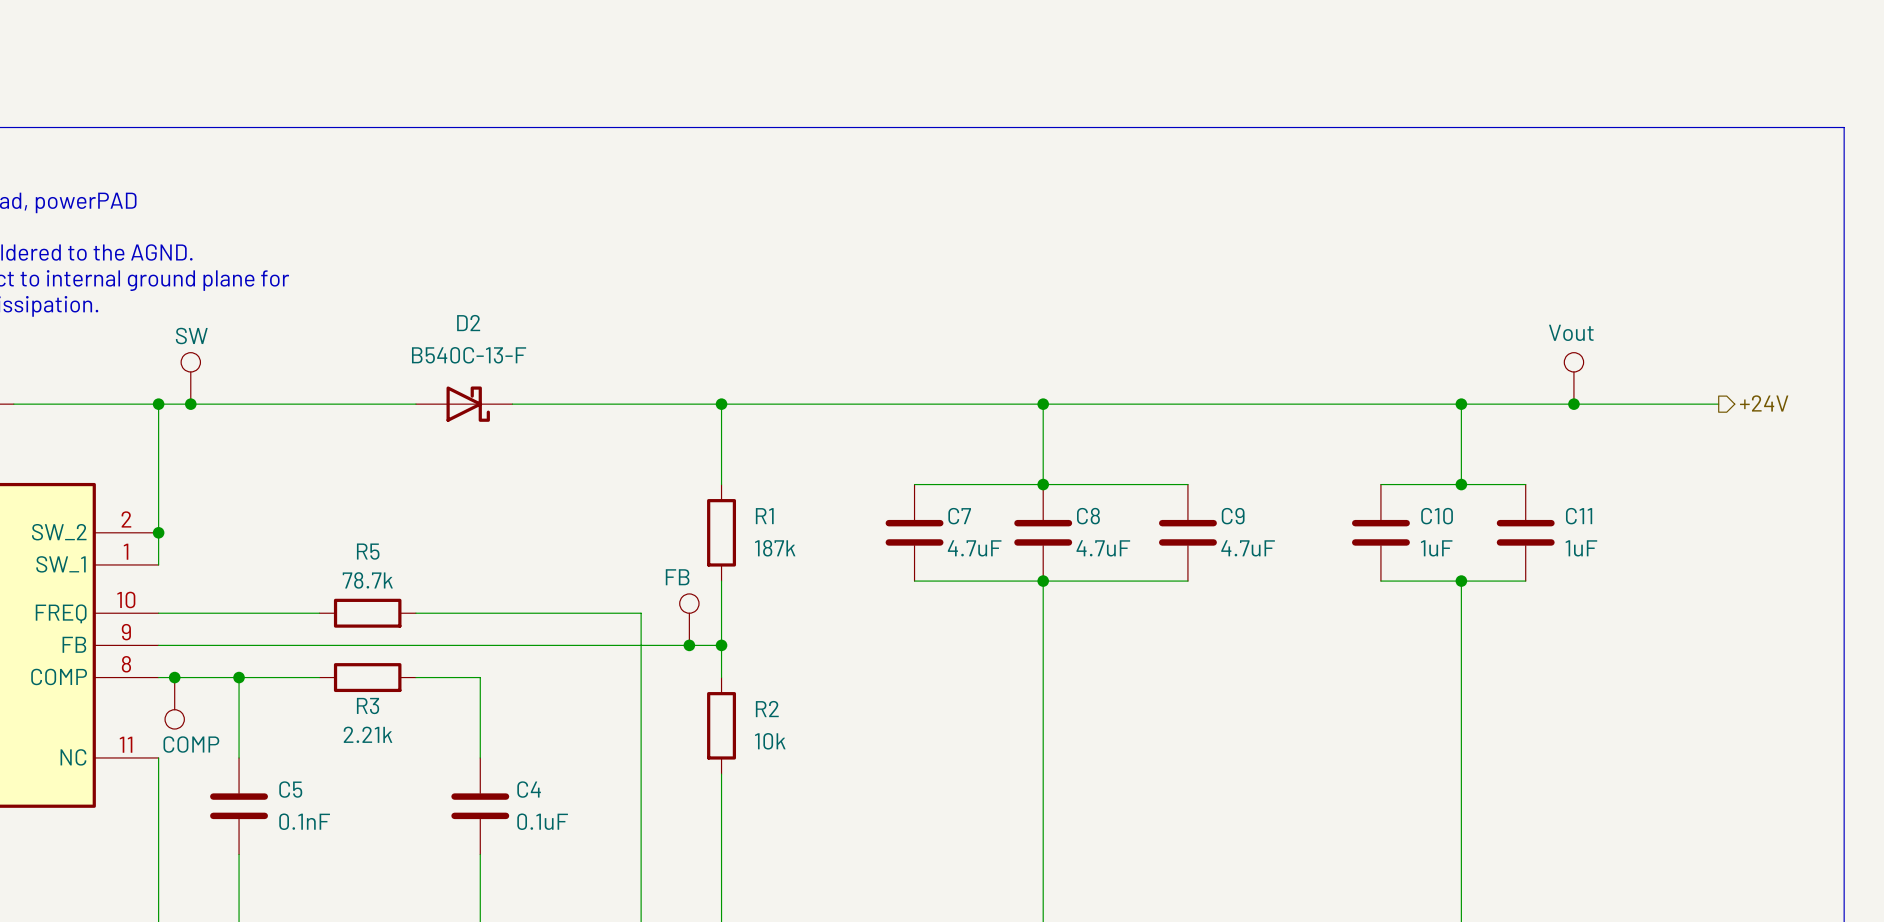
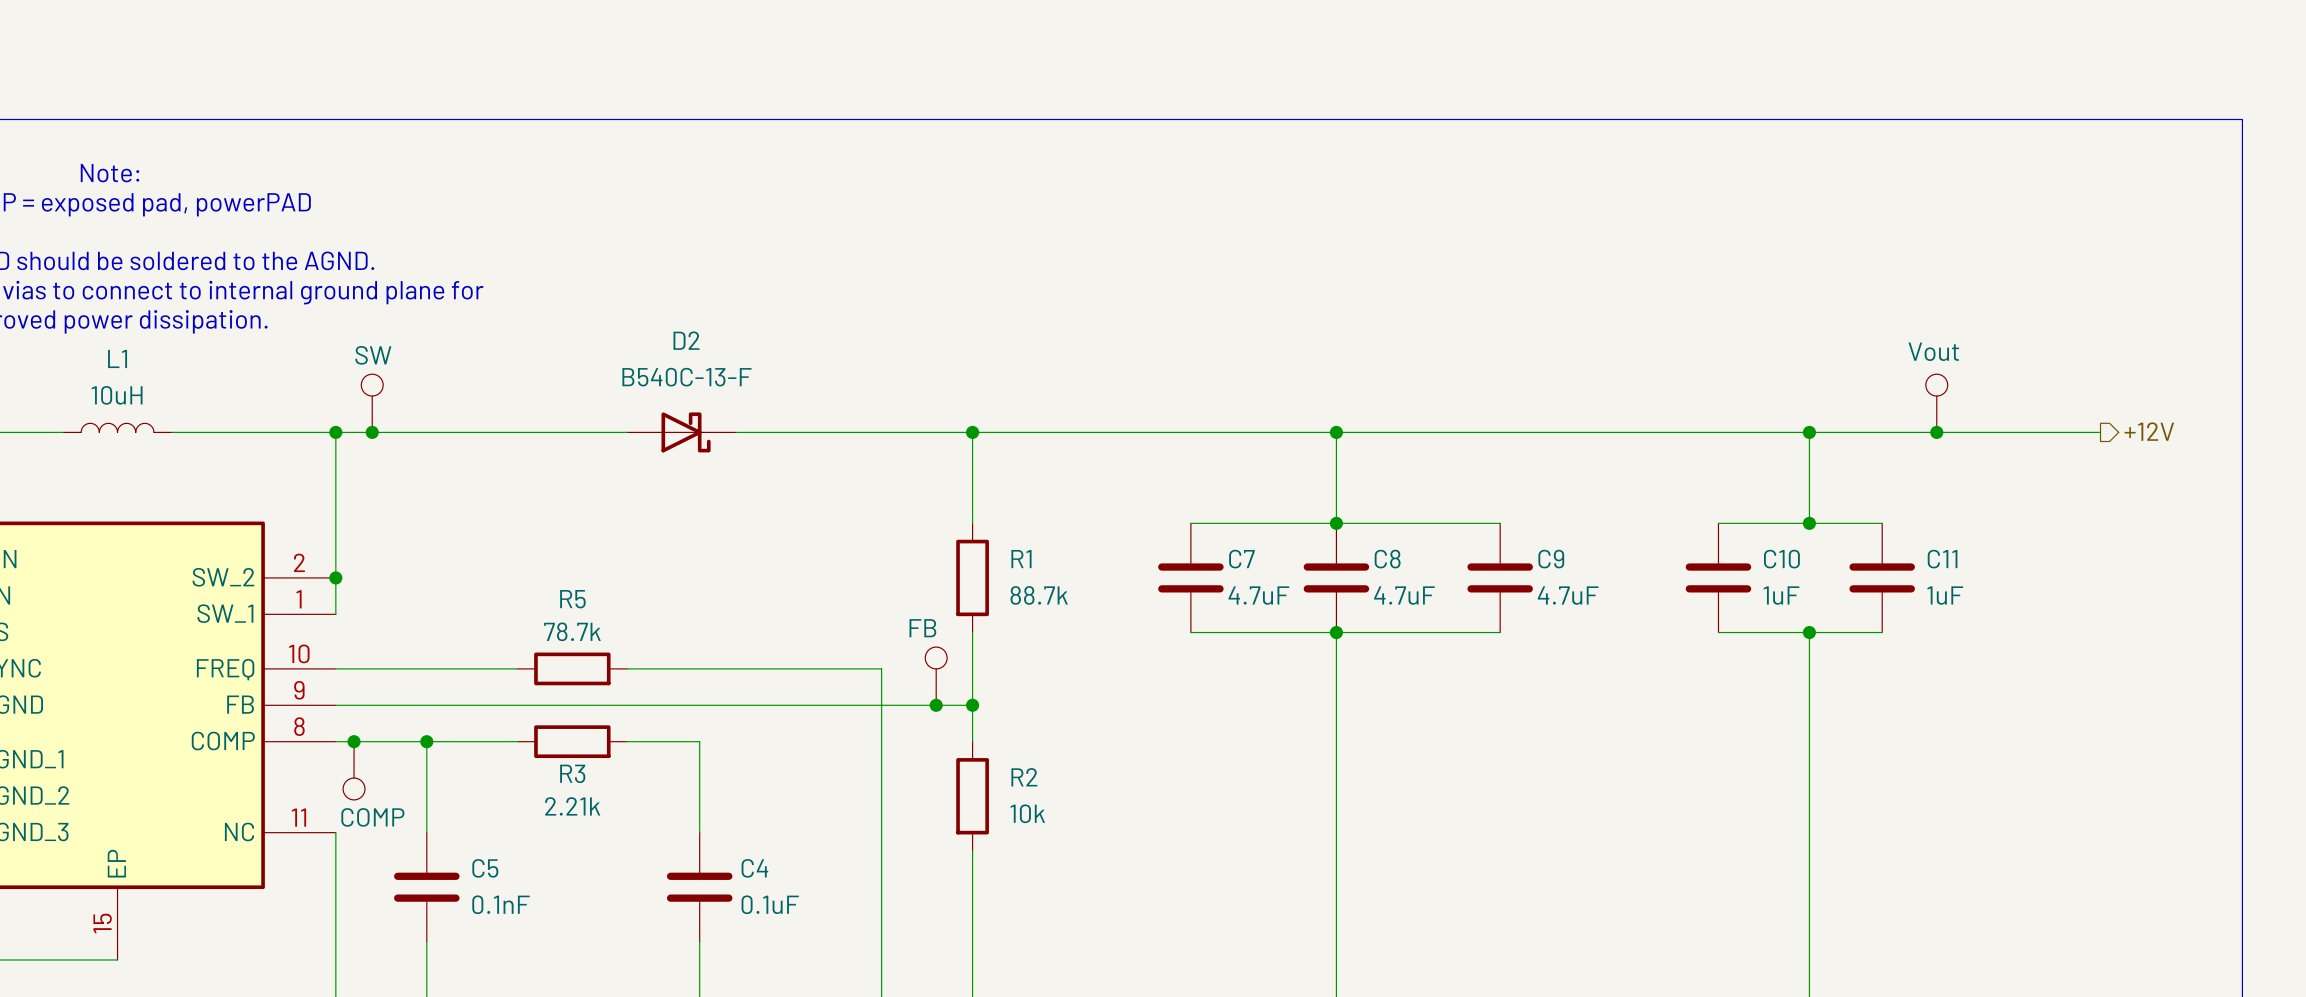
hierarchical label: +24V (1764, 403) -> +12V (2149, 431)
R1 value: 187k (775, 548) -> 88.7k (1039, 595)

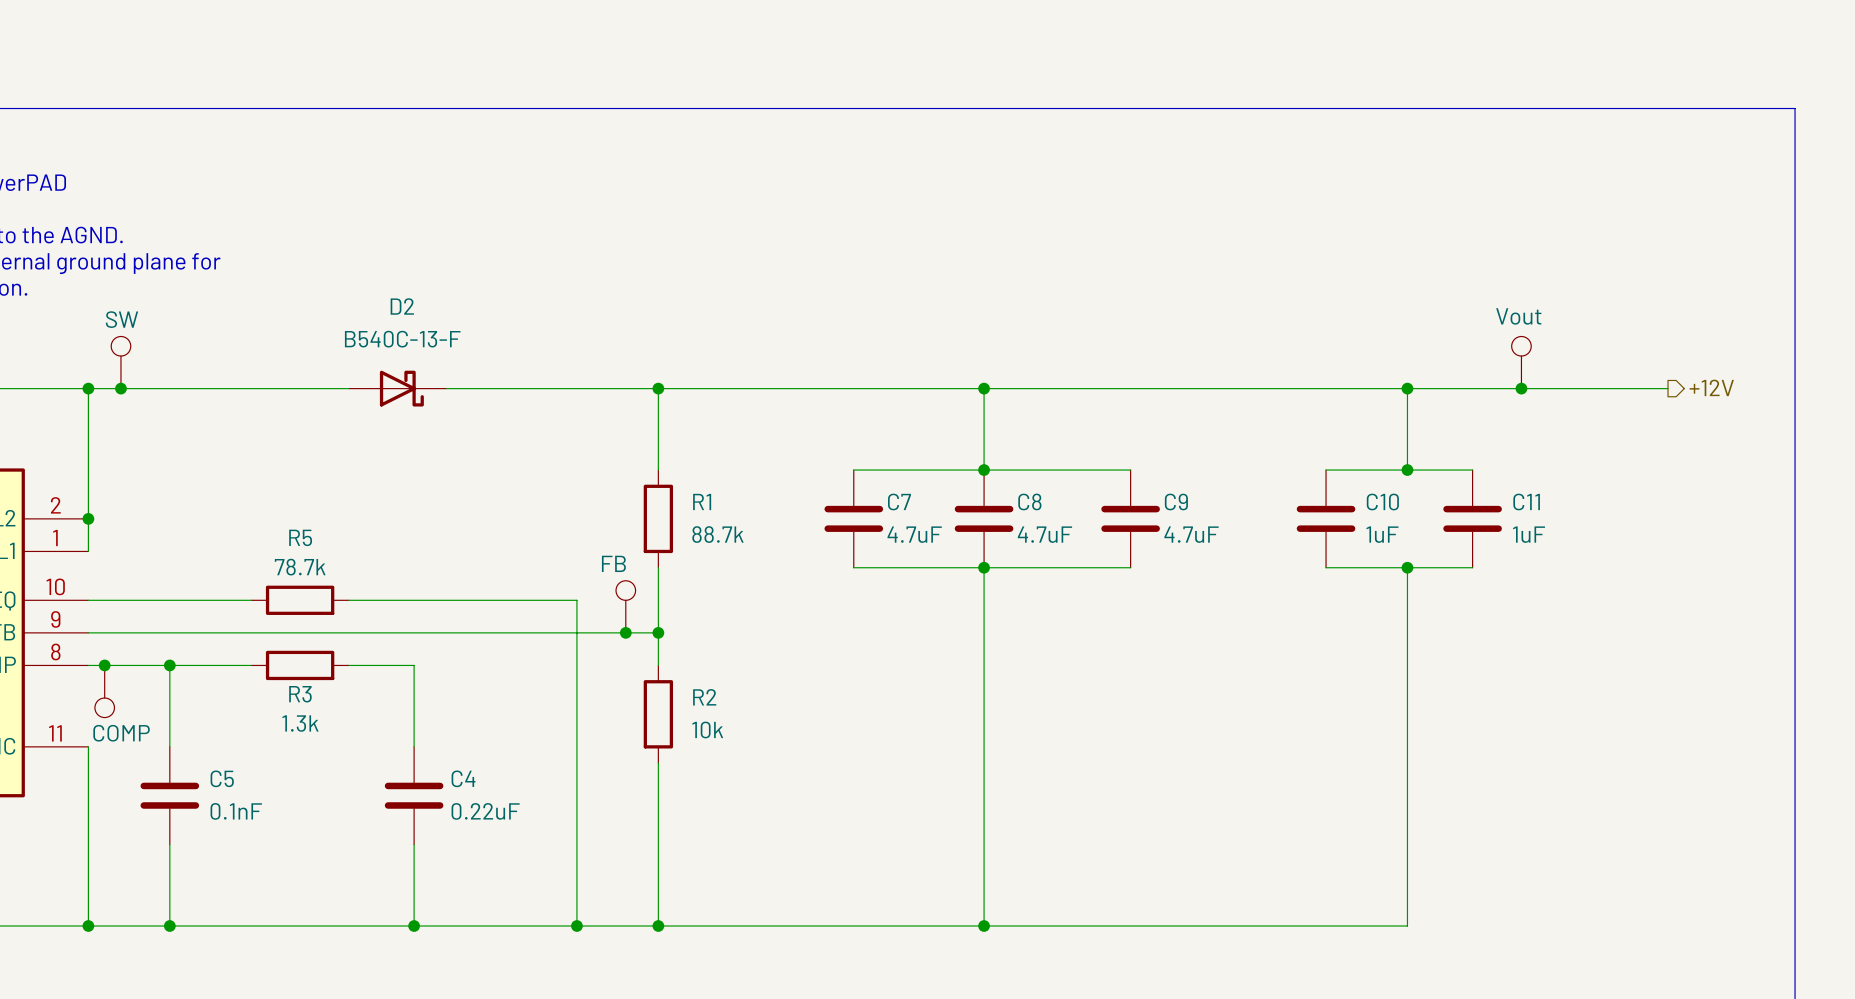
R3 value: 2.21k (572, 806) -> 1.3k (300, 723)
C4 value: 0.1uF (770, 904) -> 0.22uF (485, 811)

